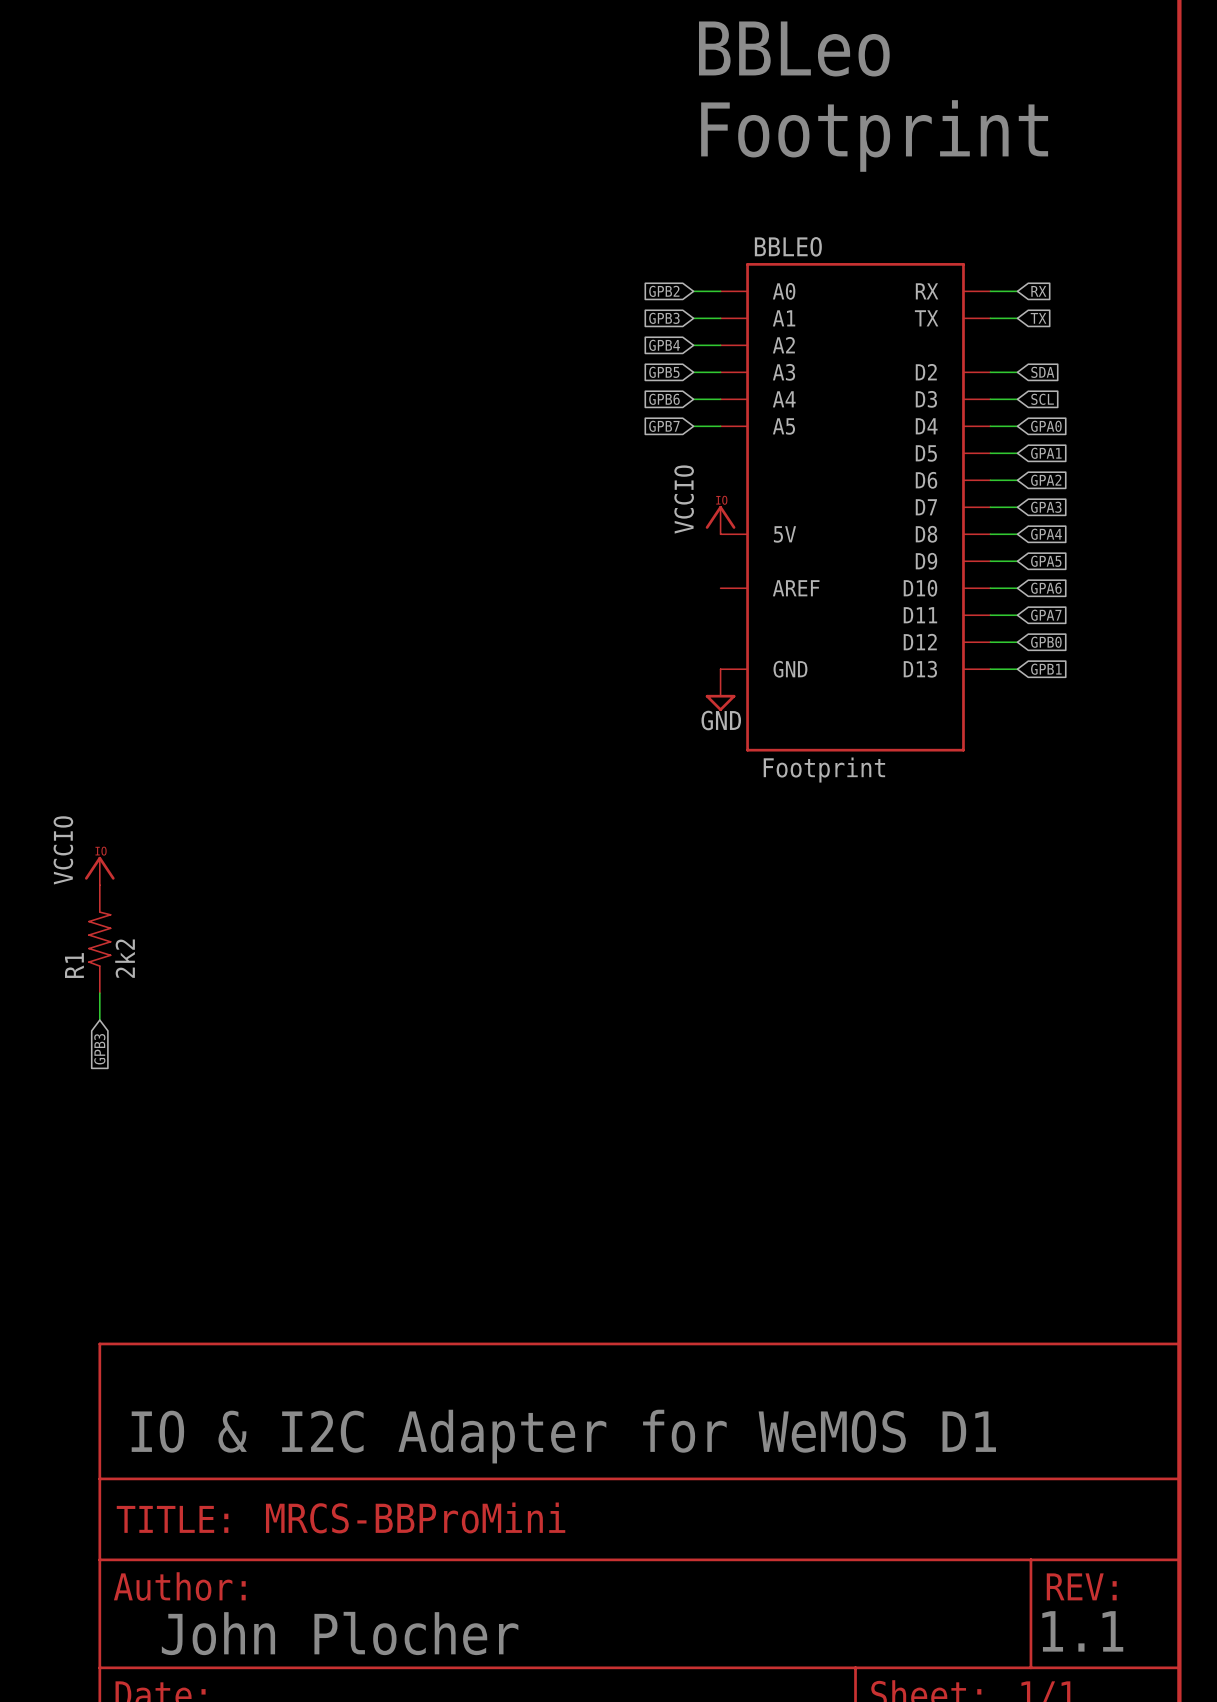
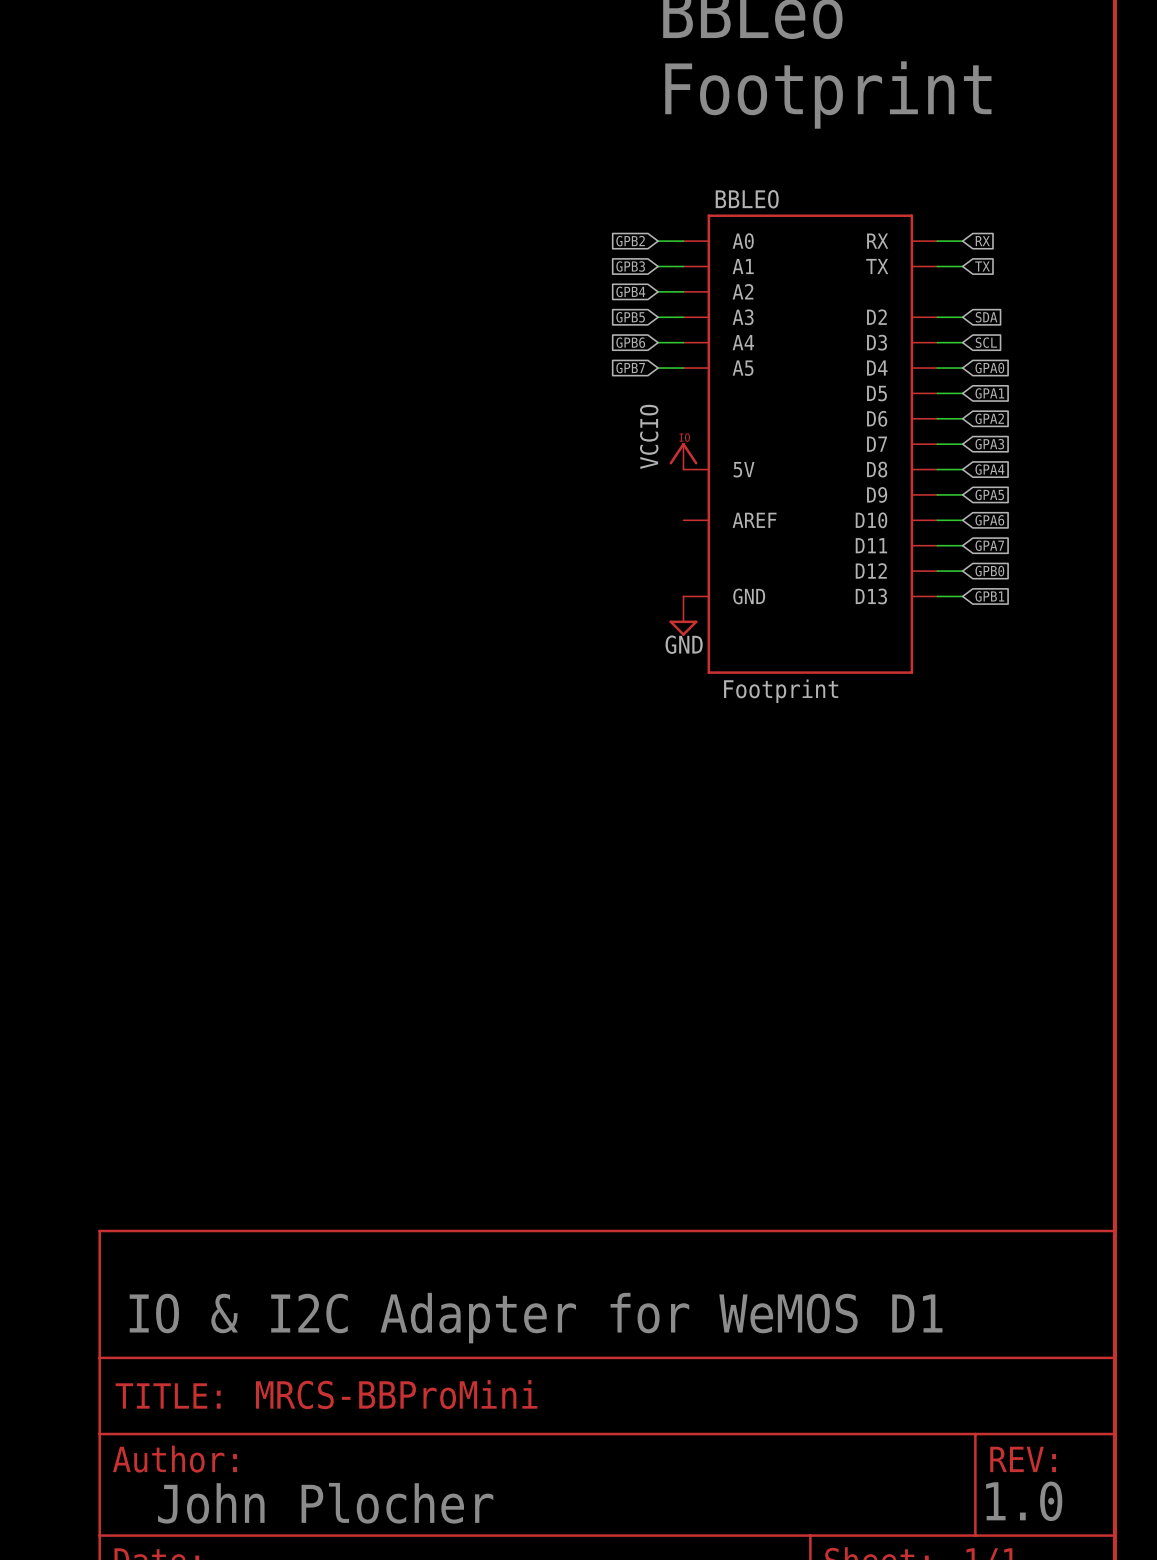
power symbol: VCCIO (99, 870) -> none
R1: 2k2 (99, 939) -> none
wire: (99, 993) (99, 1020) -> none
global label: GPB3 (99, 1049) -> none
text: 1.1 (1082, 1631) -> 1.0 (1024, 1501)

